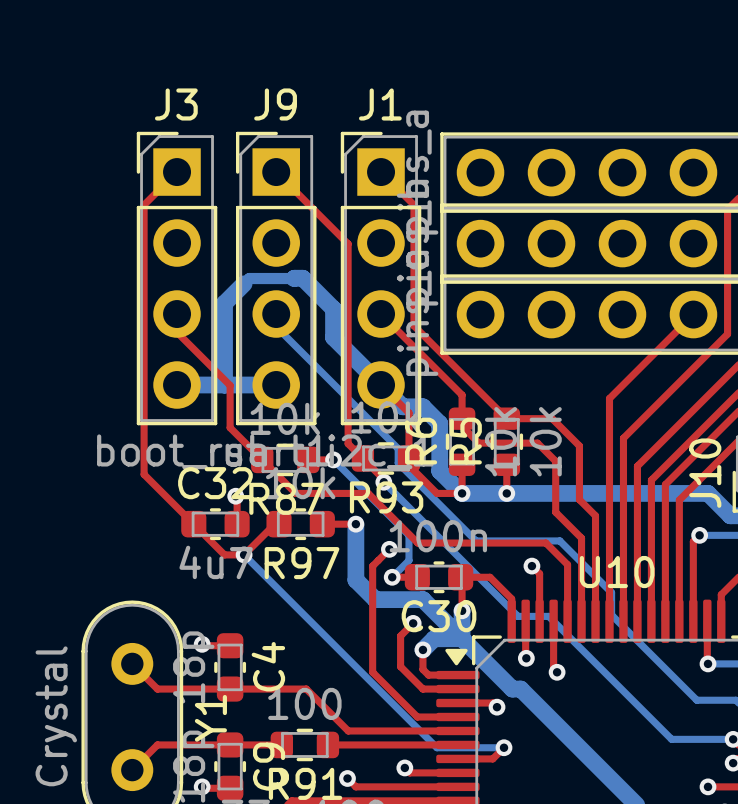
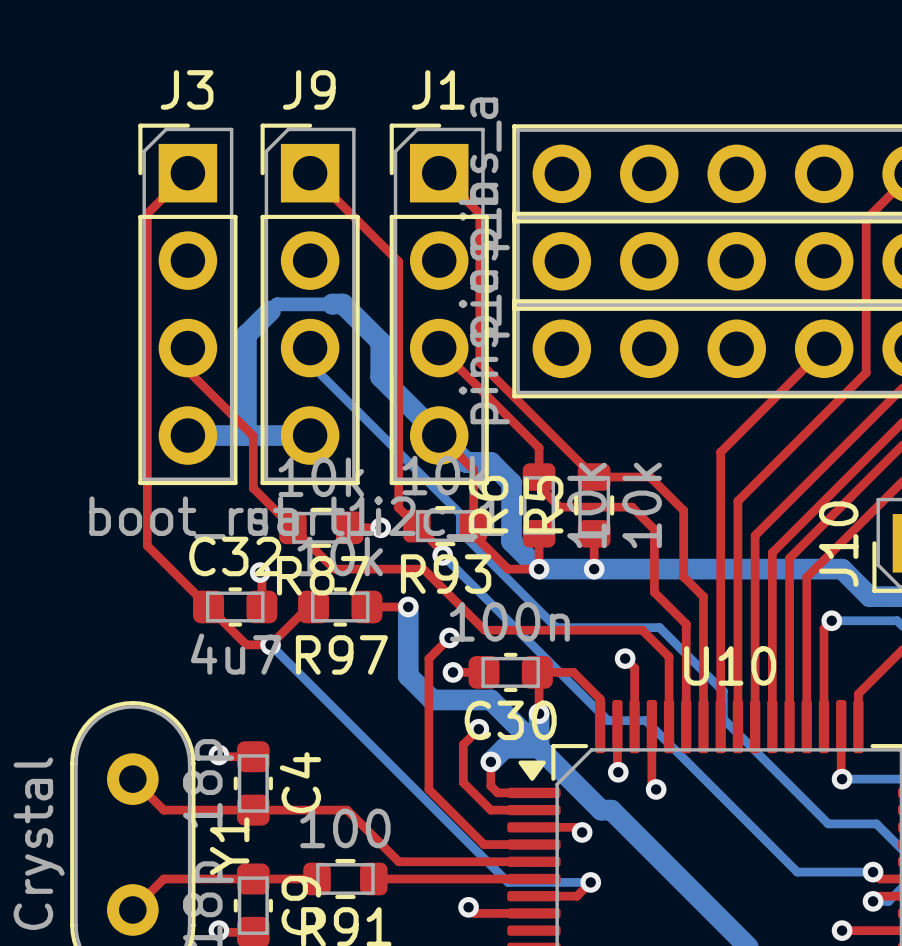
bottom track: (333, 459) (408, 535) (408, 560) (392, 577) -> none
top track: (347, 778) (355, 786) (457, 786) -> none
via: (347, 778) -> none

